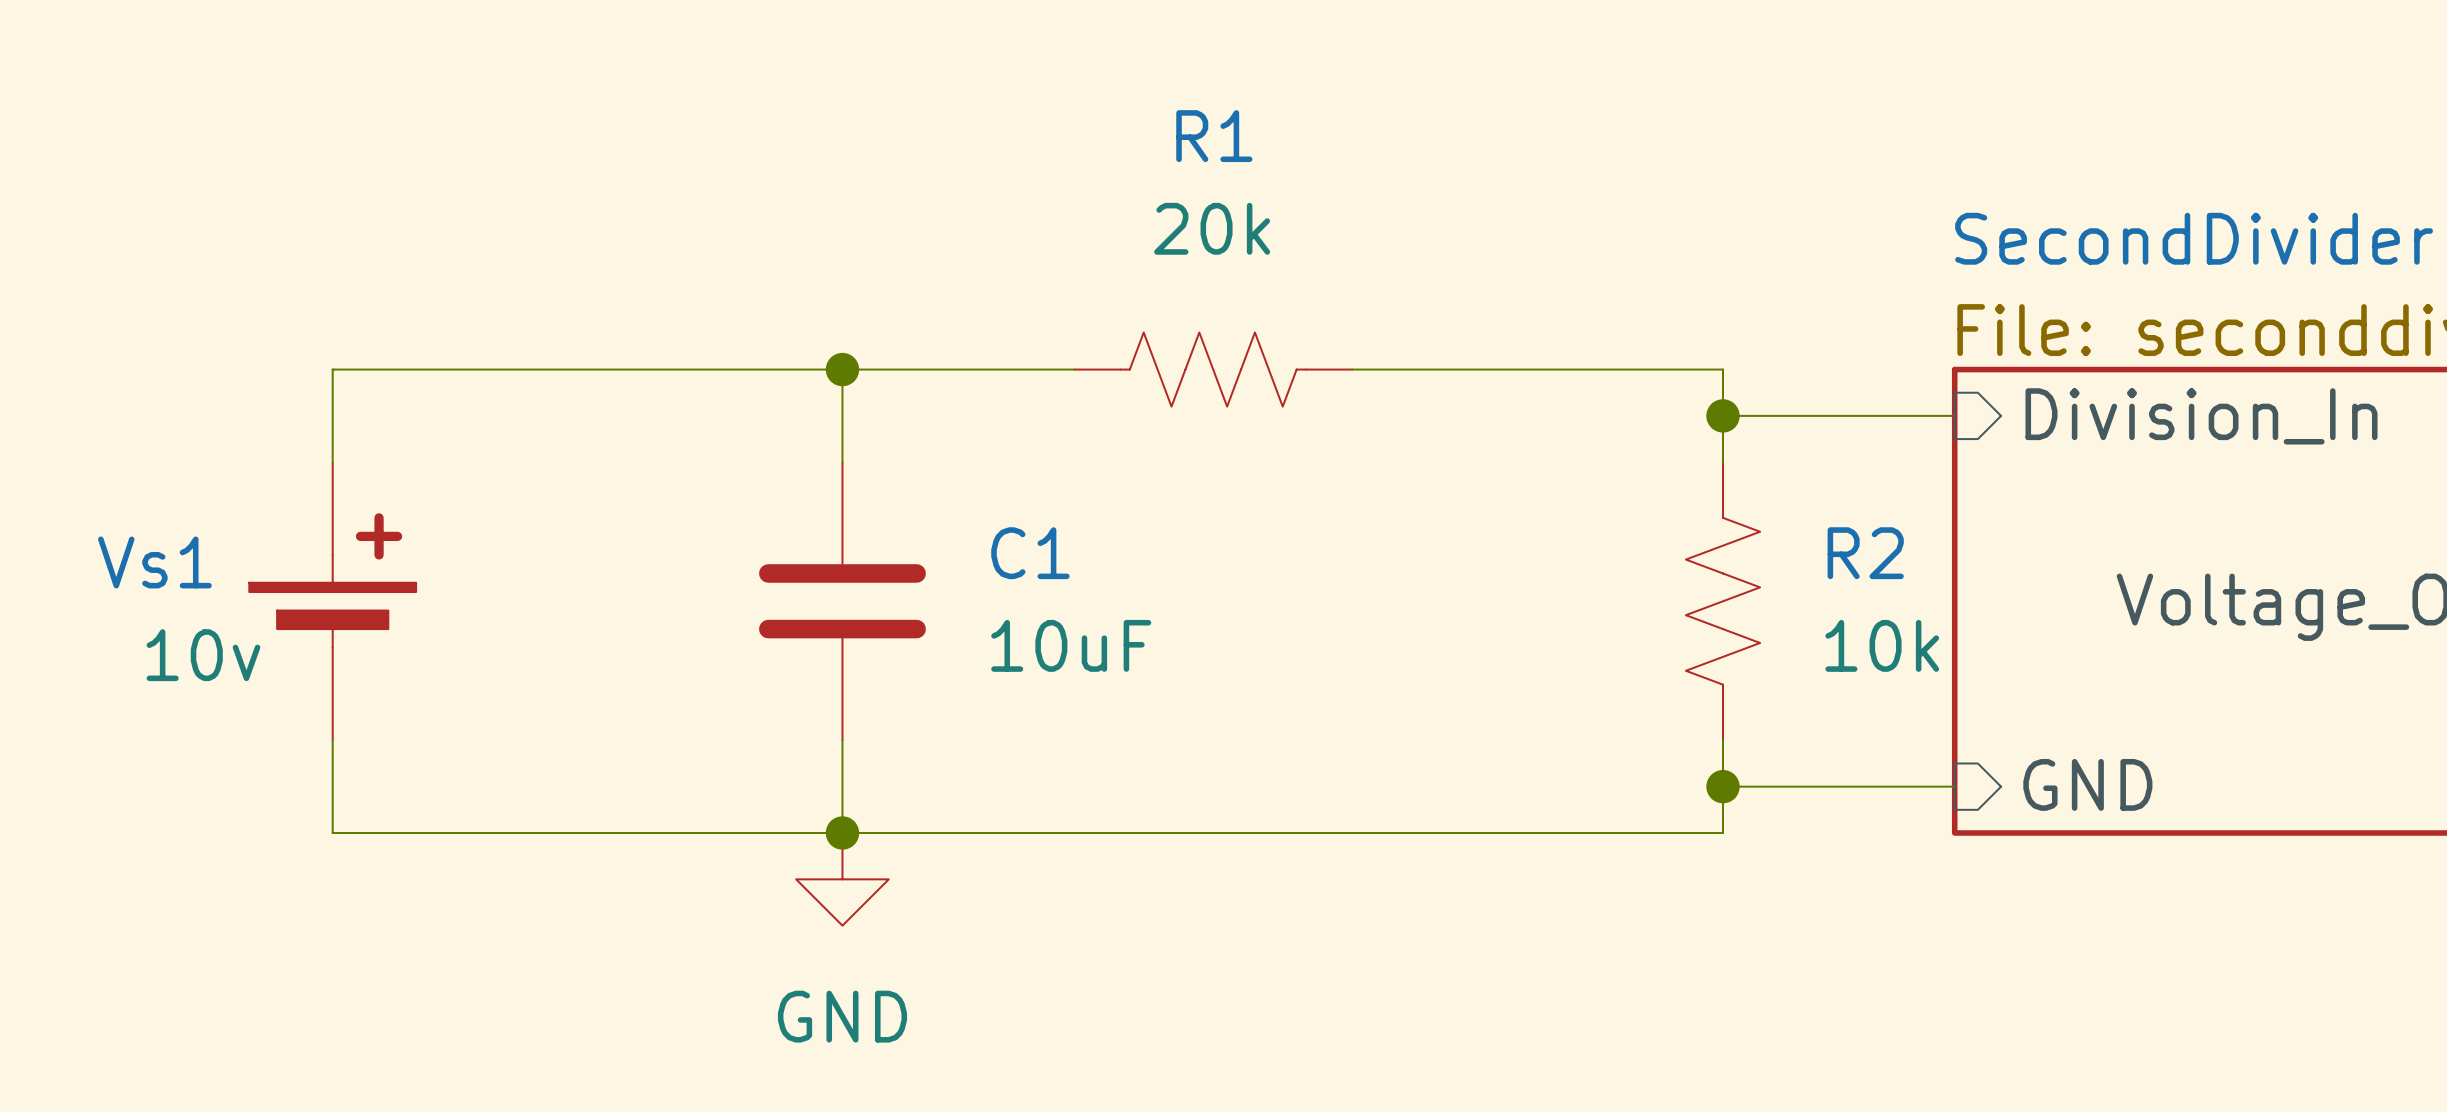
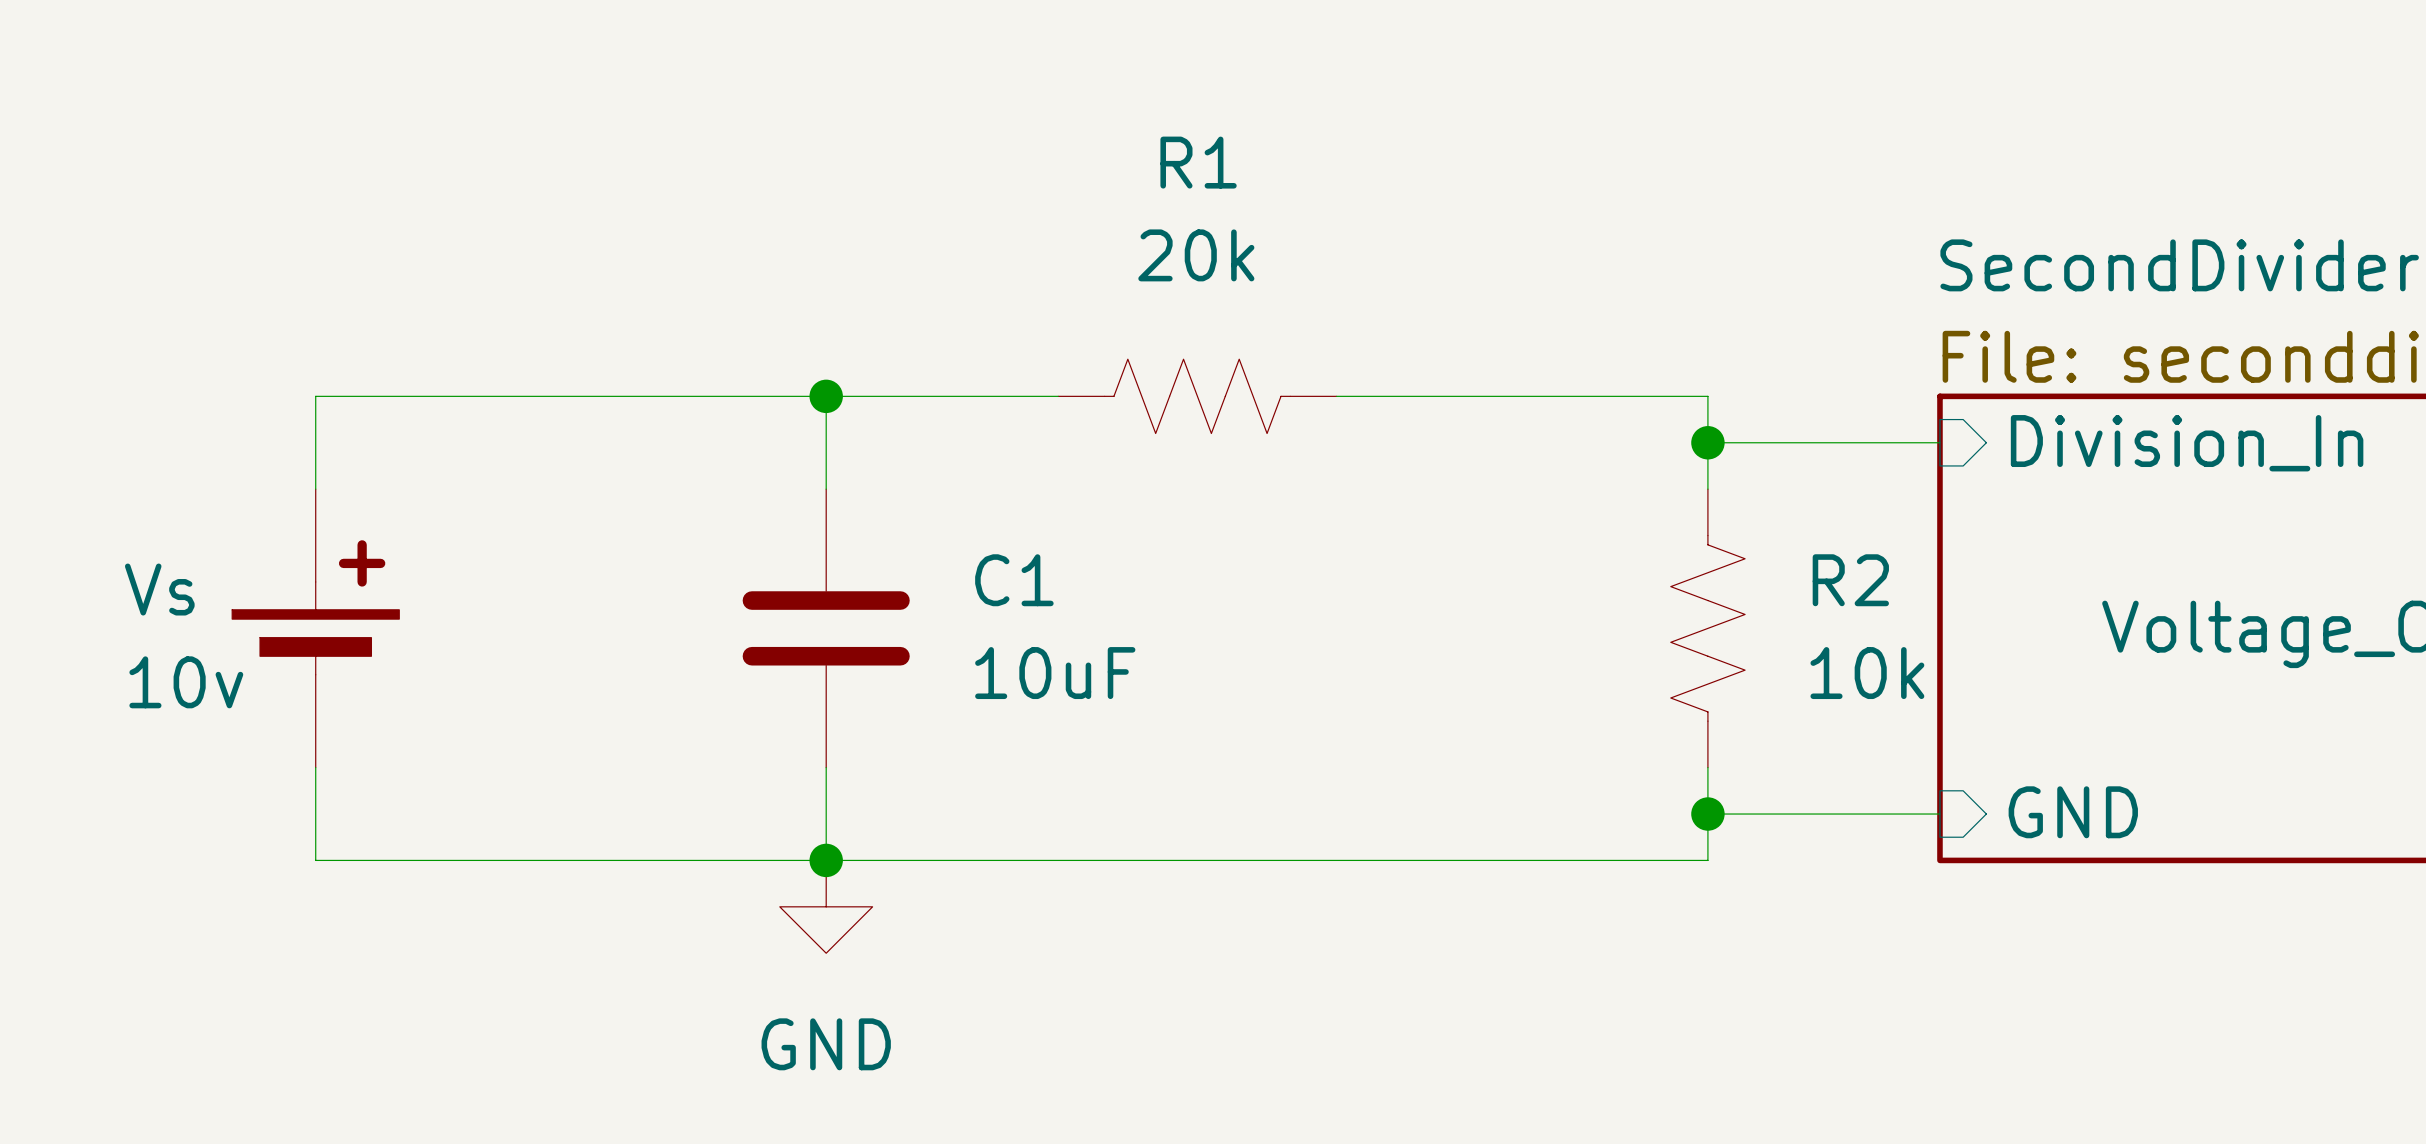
Vs1 name: Vs1 (154, 562) -> Vs (159, 589)

